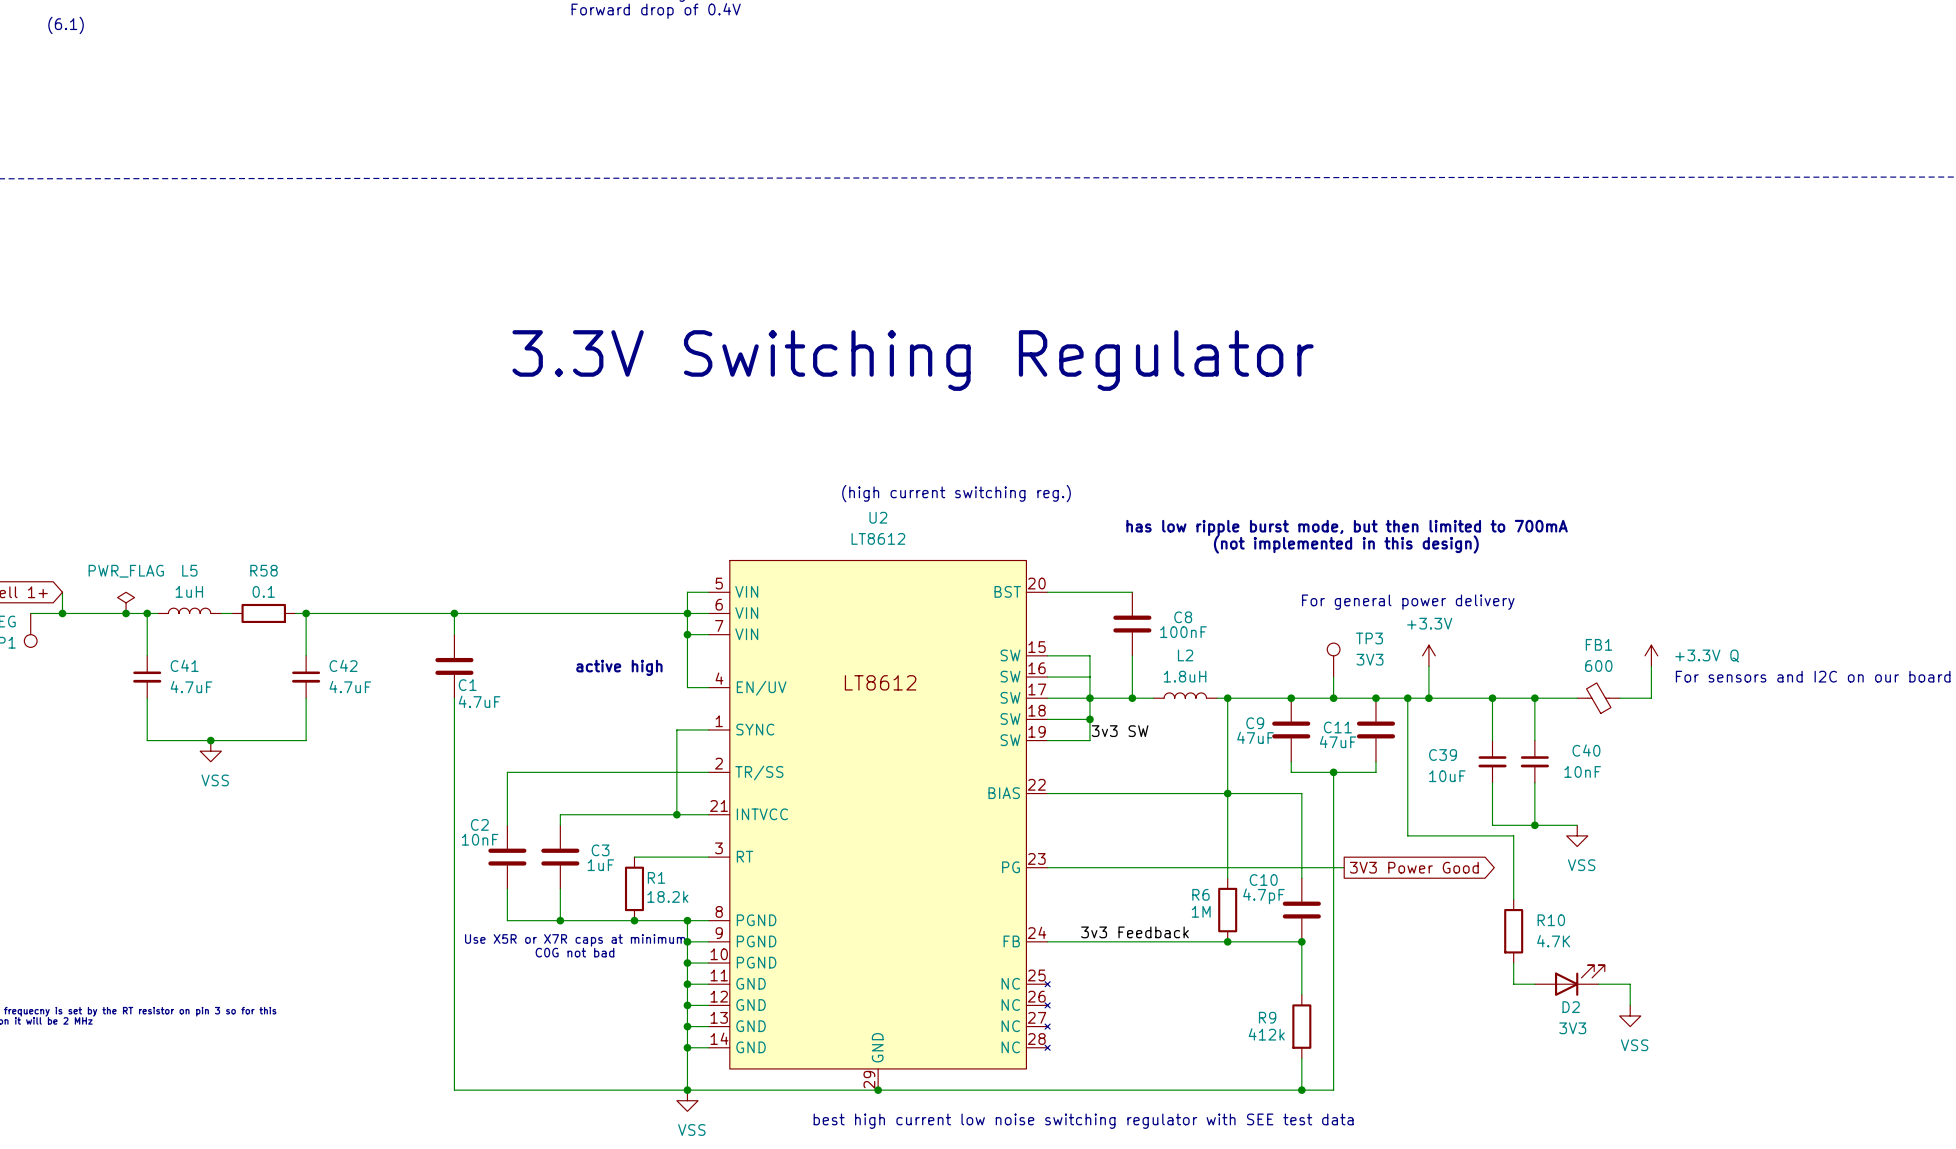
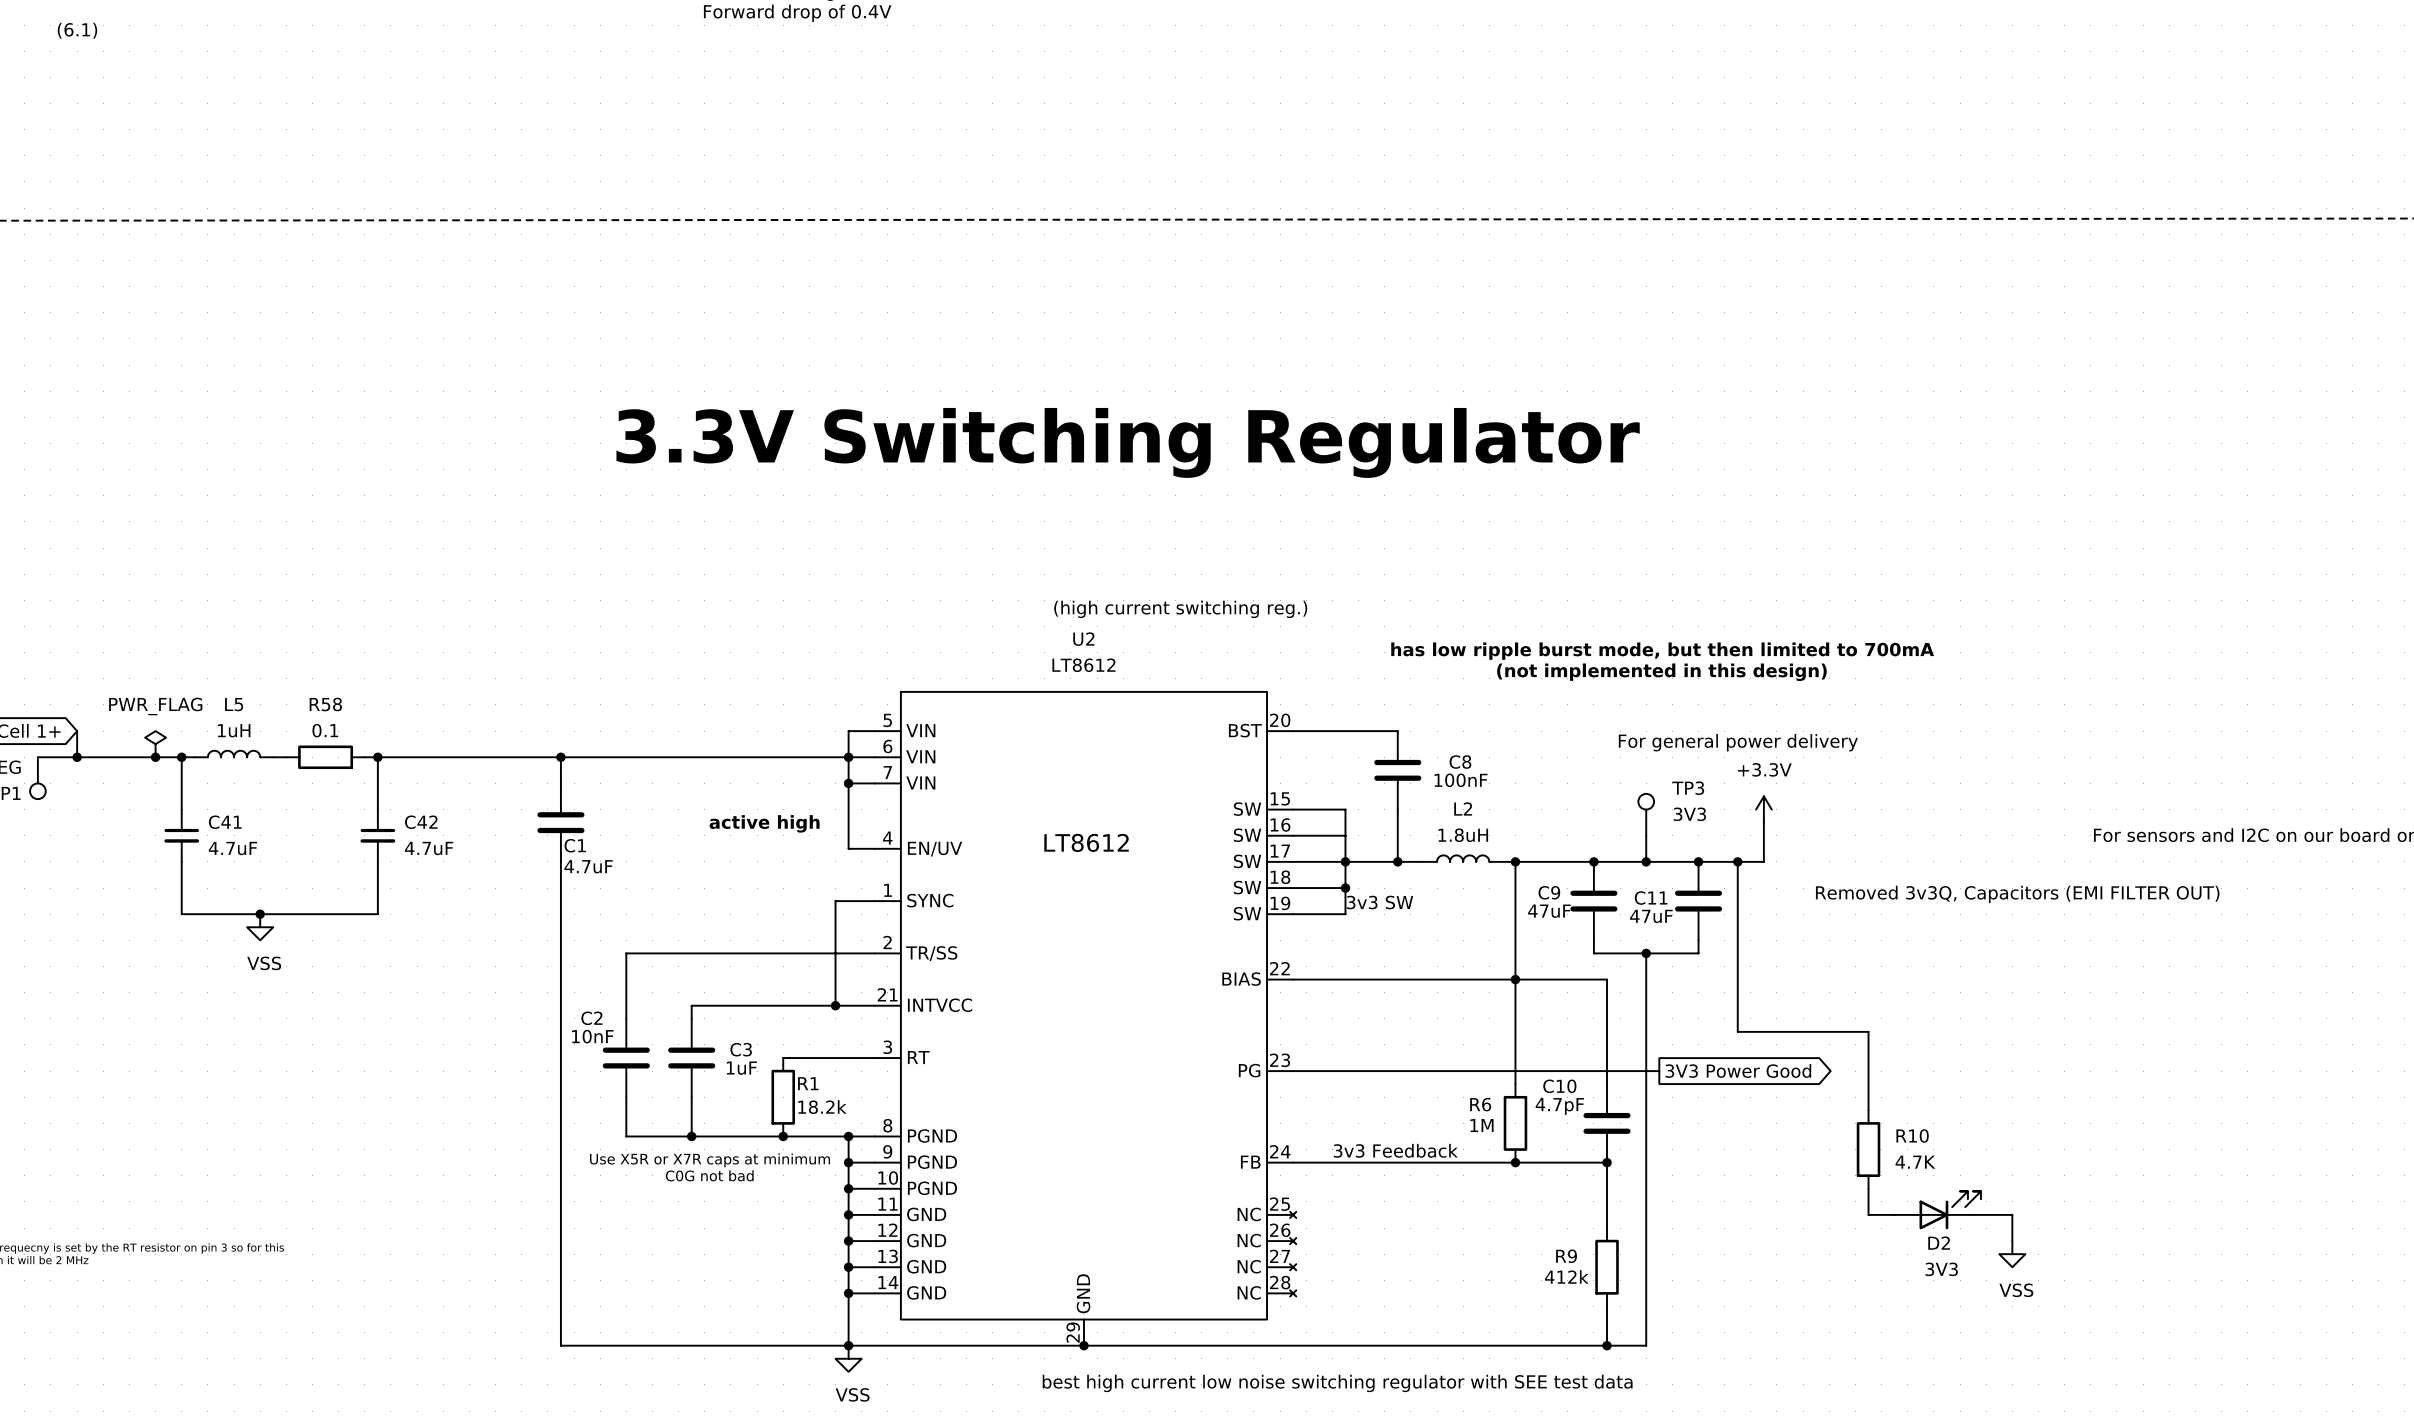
power symbol: +3.3V Q (1651, 655) -> none
wire: (1651, 666) (1651, 698) (1619, 698) -> none
wire: (1428, 698) (1577, 698) -> none
junction: (1428, 698) -> none
wire: (1492, 698) (1492, 740) -> none
junction: (1492, 698) -> none
wire: (1534, 698) (1534, 740) -> none
junction: (1534, 698) -> none
FB1: 600 (1598, 698) -> none
text: none -> Removed 3v3Q, Capacitors (EMI FILTER OUT) (2017, 894)
C39: 10uF (1492, 761) -> none
C40: 10nF (1534, 761) -> none
wire: (1492, 782) (1492, 825) (1577, 825) -> none
wire: (1534, 782) (1534, 825) -> none
junction: (1534, 825) -> none
power symbol: VSS (1577, 835) -> none

